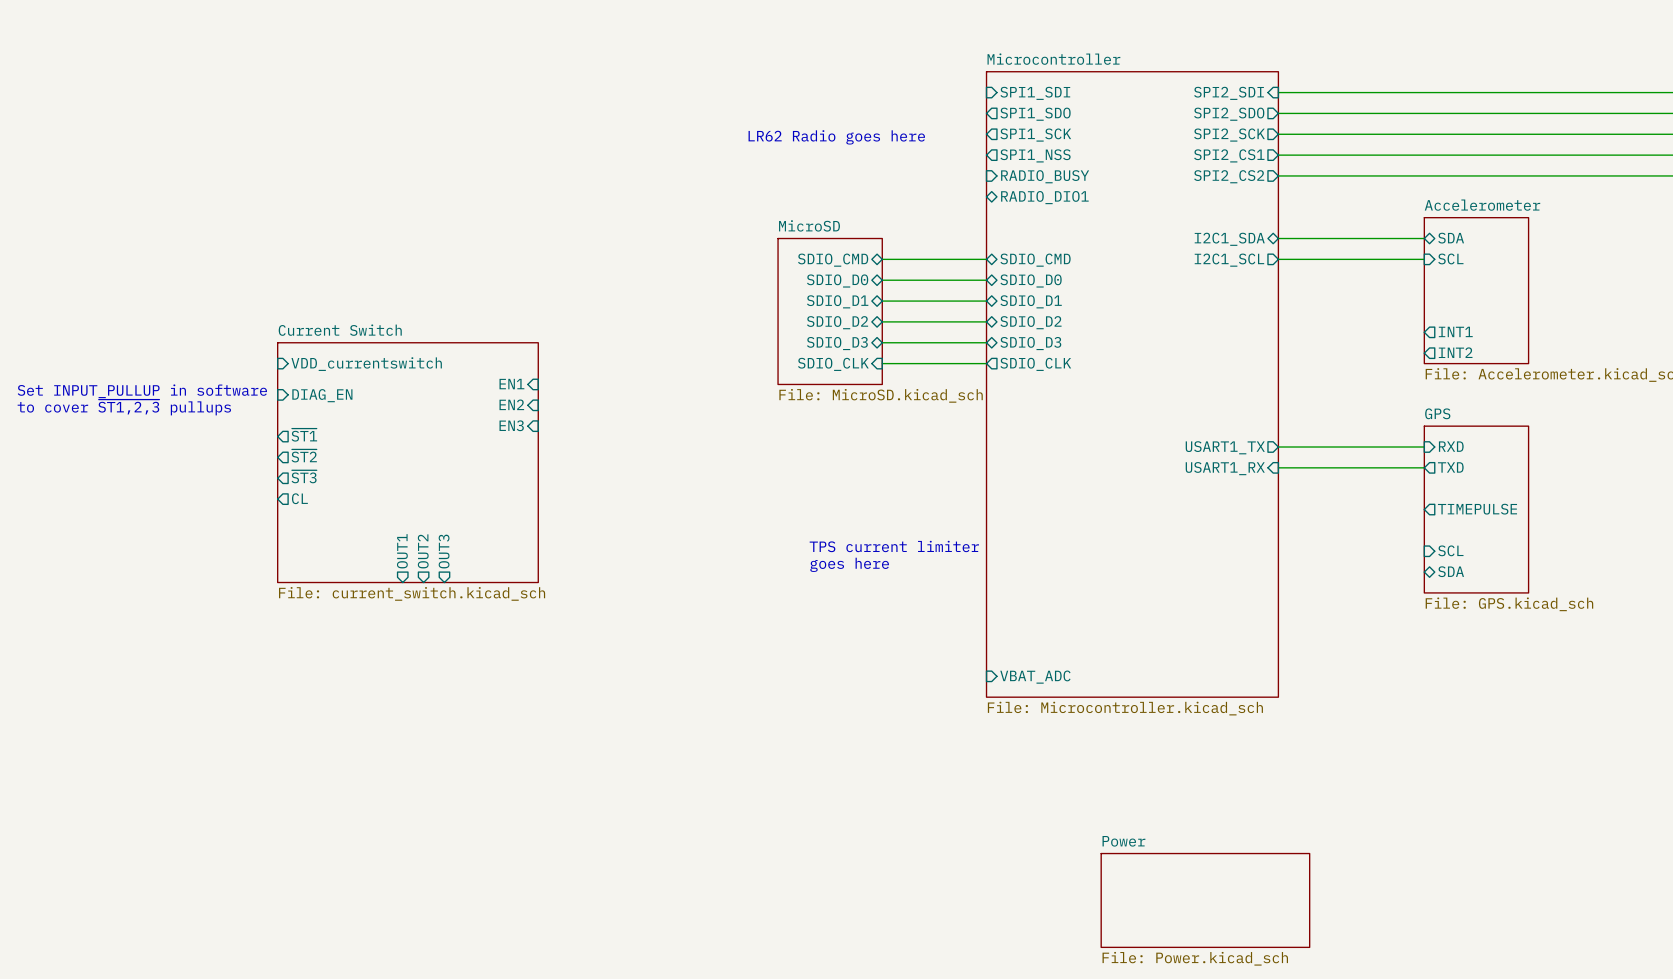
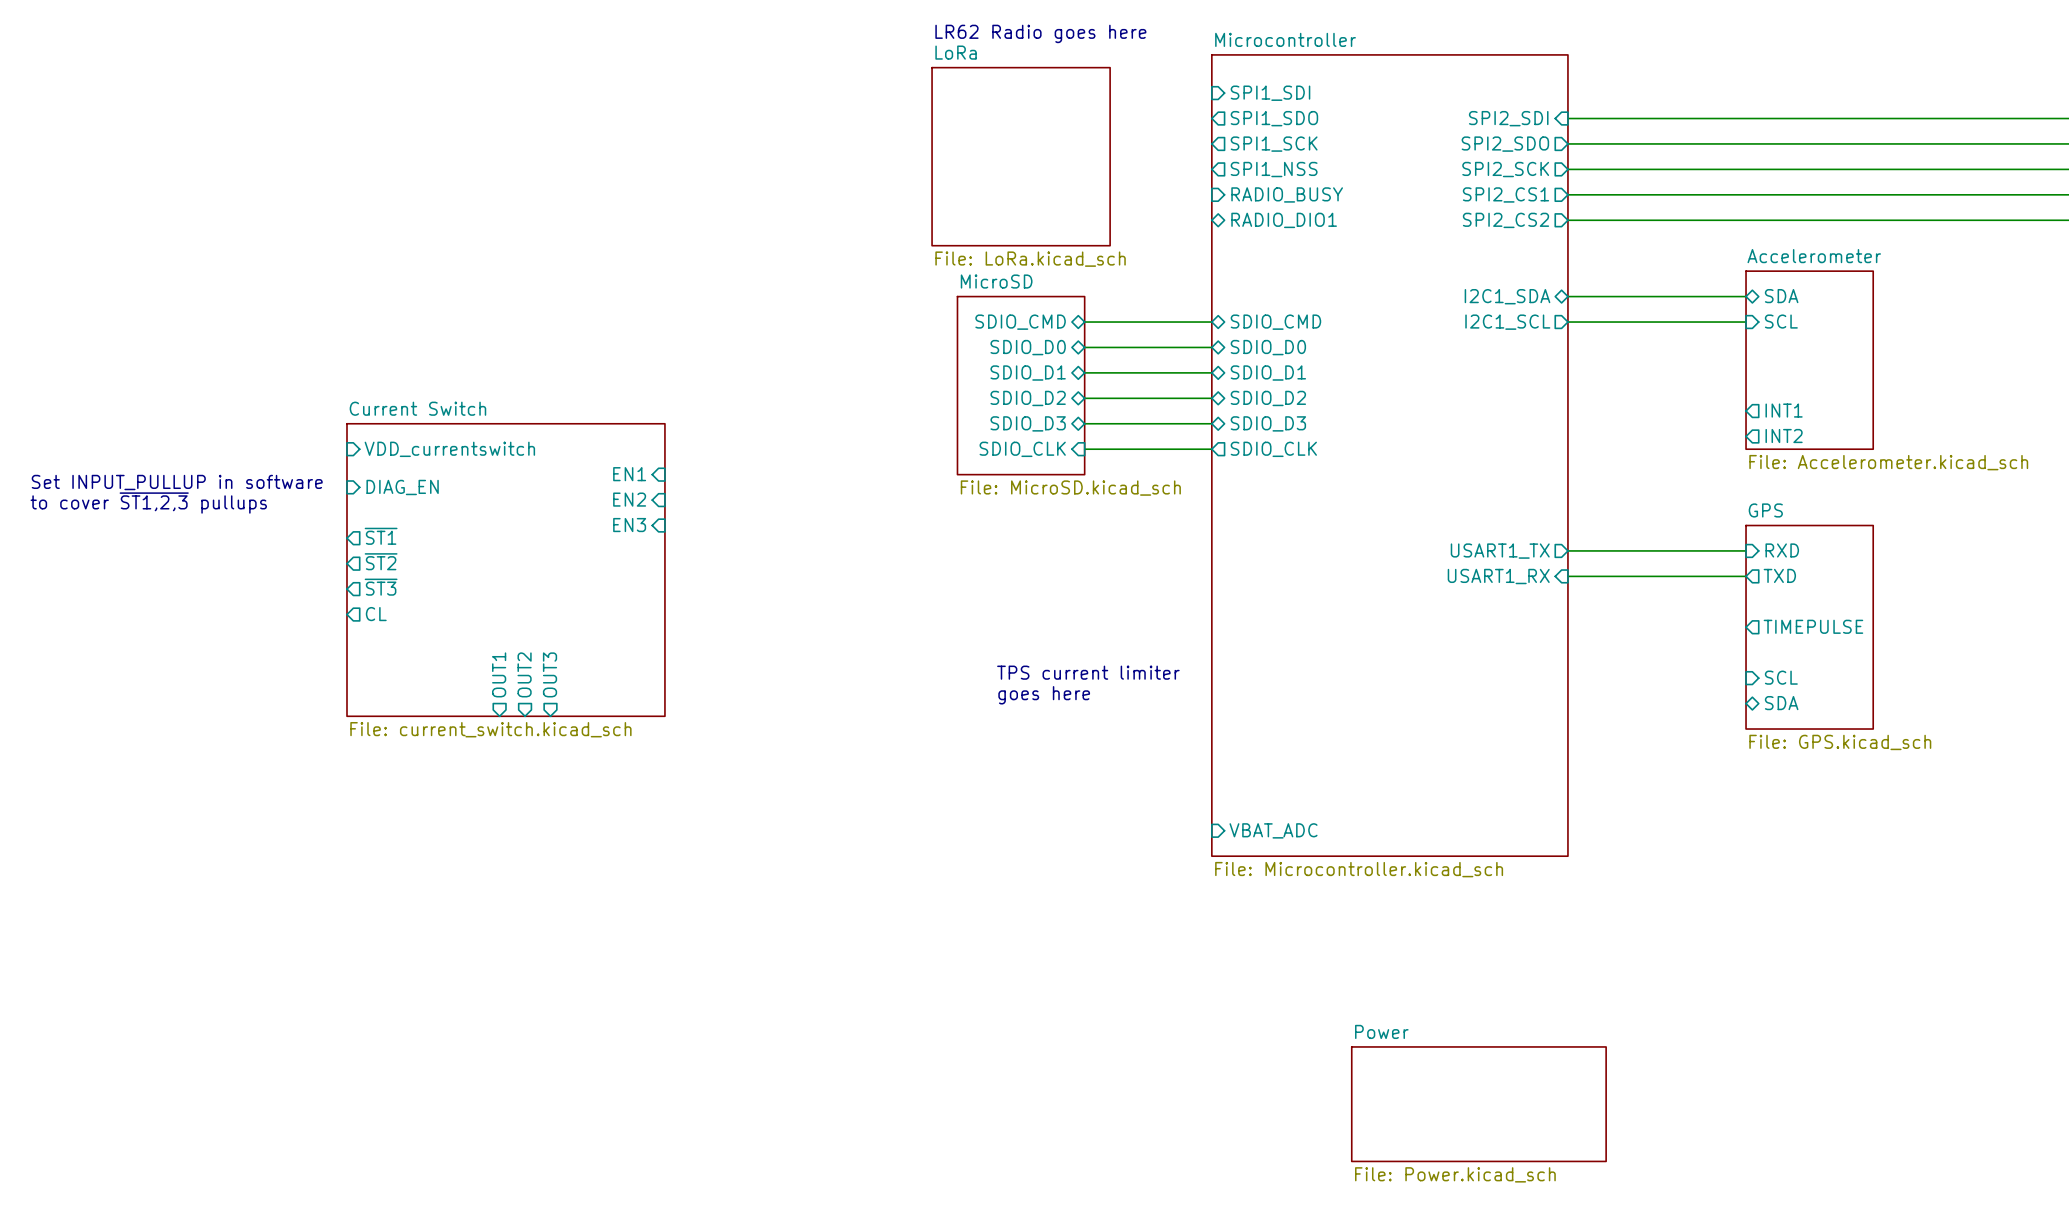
sheet pin: none -> SPI1_SDI (1270, 93)
sheet pin shape: input (1035, 93) -> output (1274, 118)
sheet pin: SPI1_SDI (1035, 93) -> SPI1_SDO (1274, 118)
sheet pin: SPI1_SDO (1035, 114) -> SPI1_SCK (1274, 144)
sheet LoRa: none -> File: LoRa.kicad_sch (1021, 156)
sheet pin: SPI1_SCK (1035, 135) -> SPI1_NSS (1274, 169)
text position: LR62 Radio goes here (836, 137) -> LR62 Radio goes here (1040, 33)
sheet pin shape: output (1035, 155) -> input (1287, 194)
sheet pin: SPI1_NSS (1035, 155) -> RADIO_BUSY (1287, 194)
sheet pin shape: input (1045, 176) -> bidirectional (1284, 220)
sheet pin: RADIO_BUSY (1045, 176) -> RADIO_DIO1 (1284, 220)
sheet pin: RADIO_DIO1 (1044, 197) -> none
sheet Microcontroller: none -> File: Microcontroller.kicad_sch (1389, 455)
sheet Microcontroller: File: Microcontroller.kicad_sch (1132, 384) -> none

